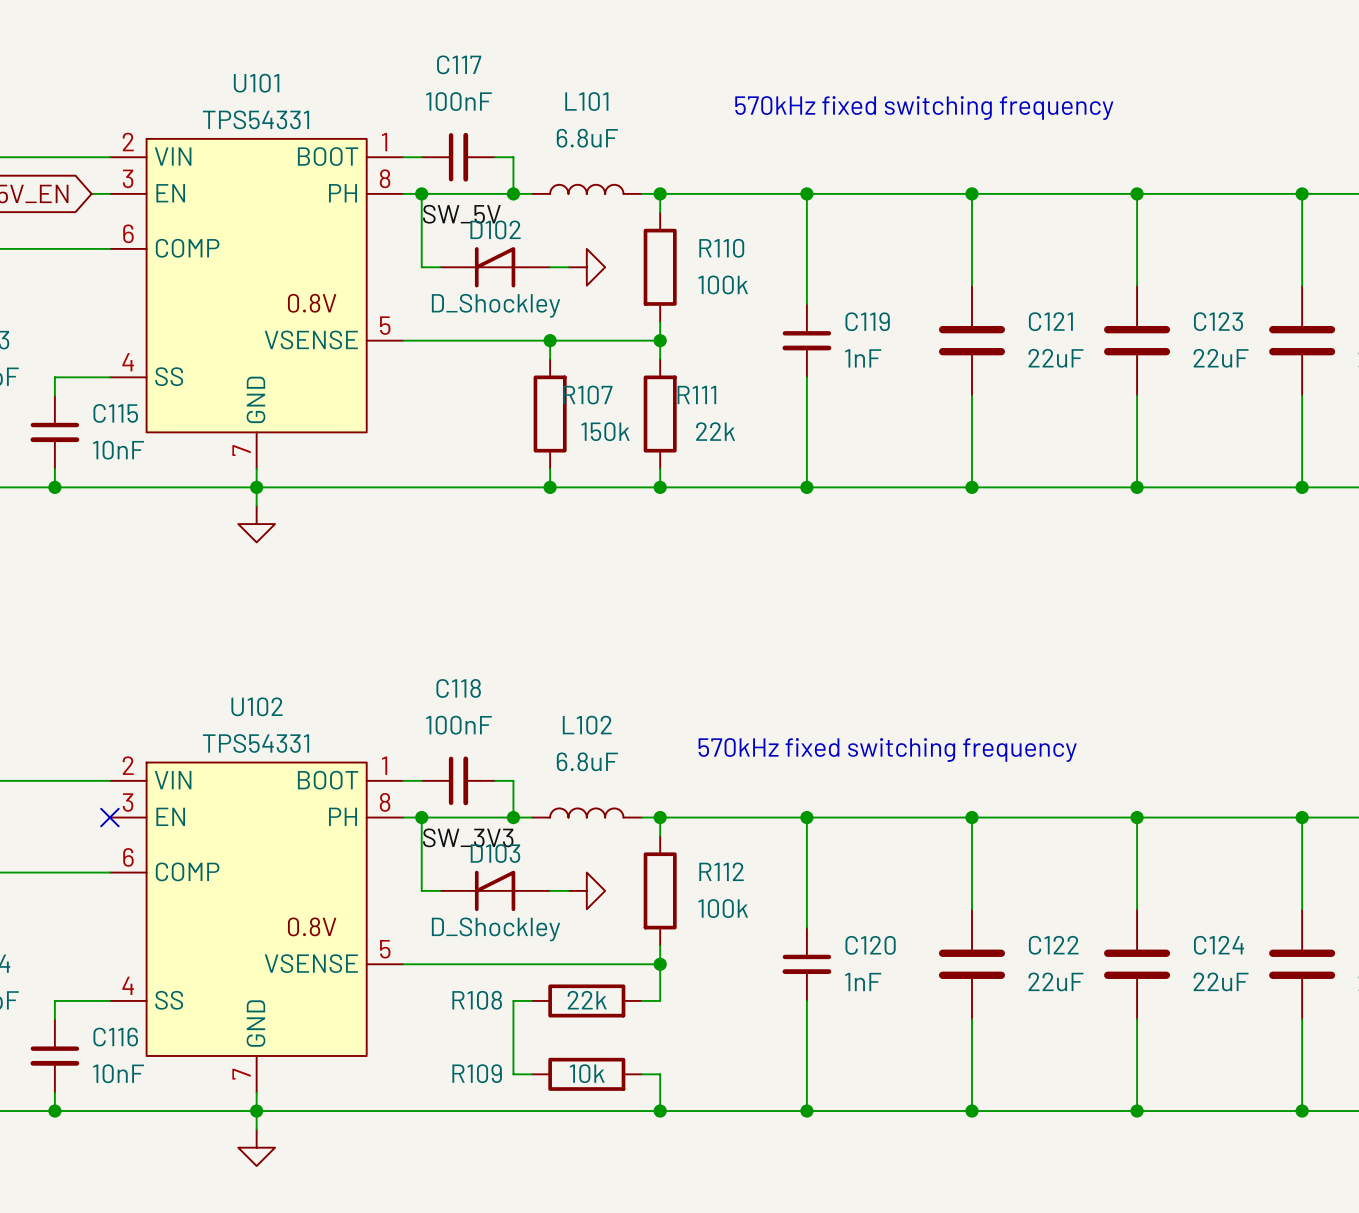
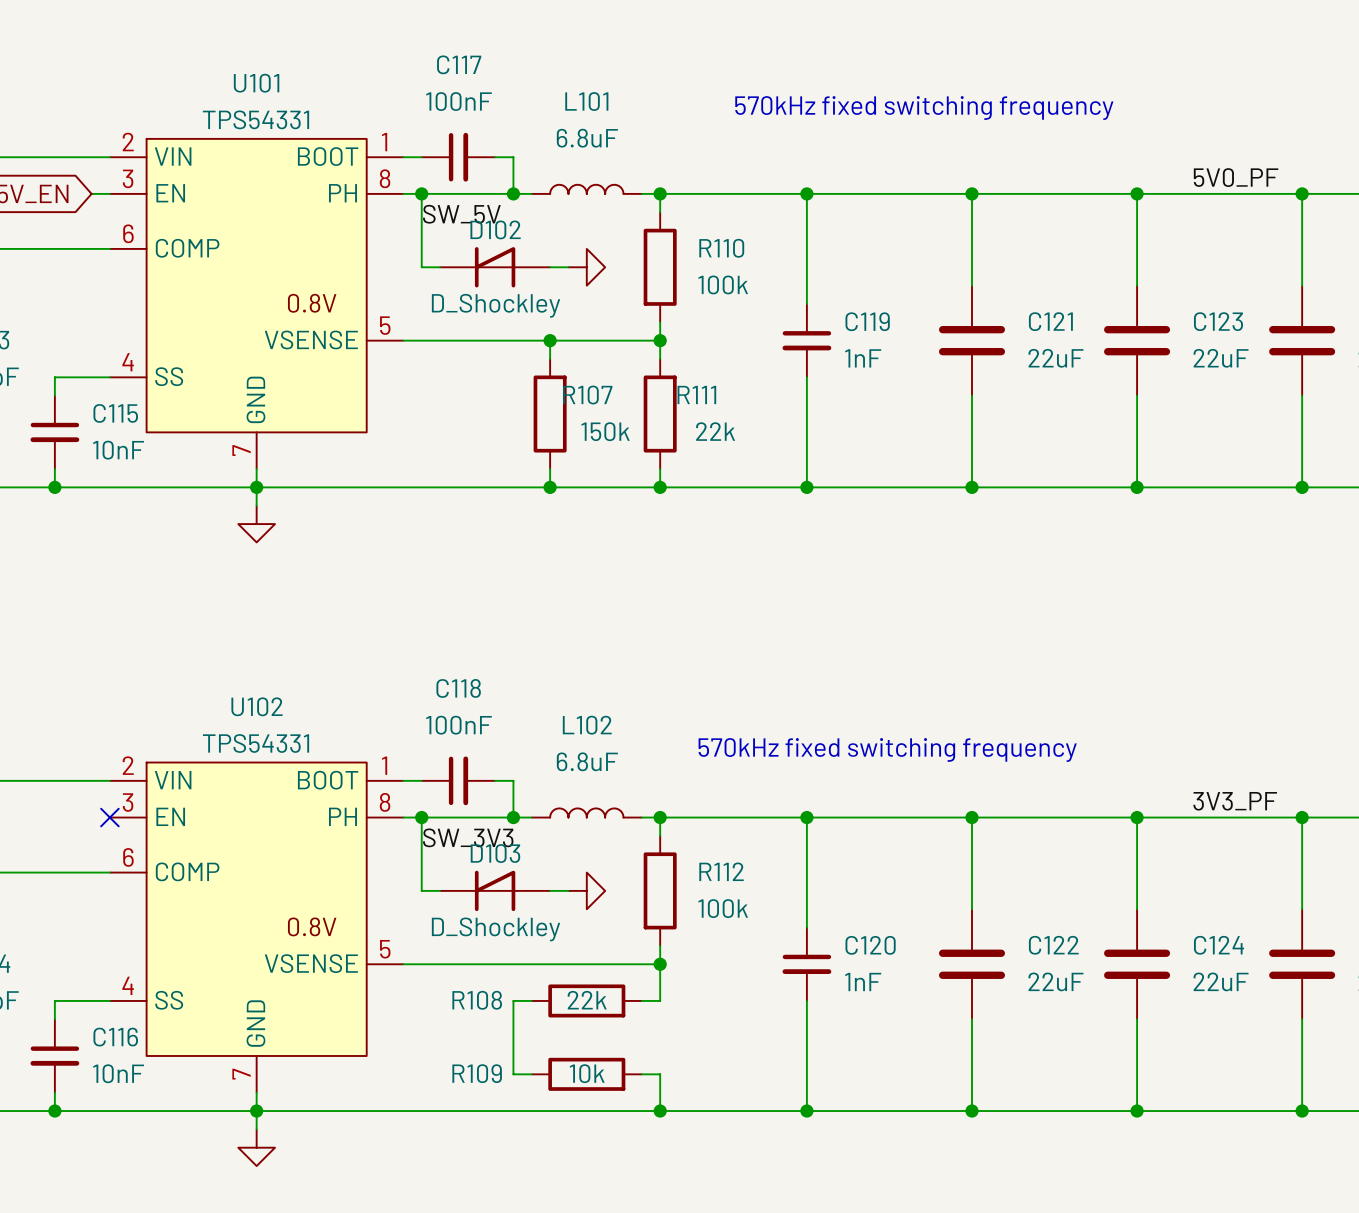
label: none -> 5V0_PF (1236, 177)
label: none -> 3V3_PF (1235, 801)

